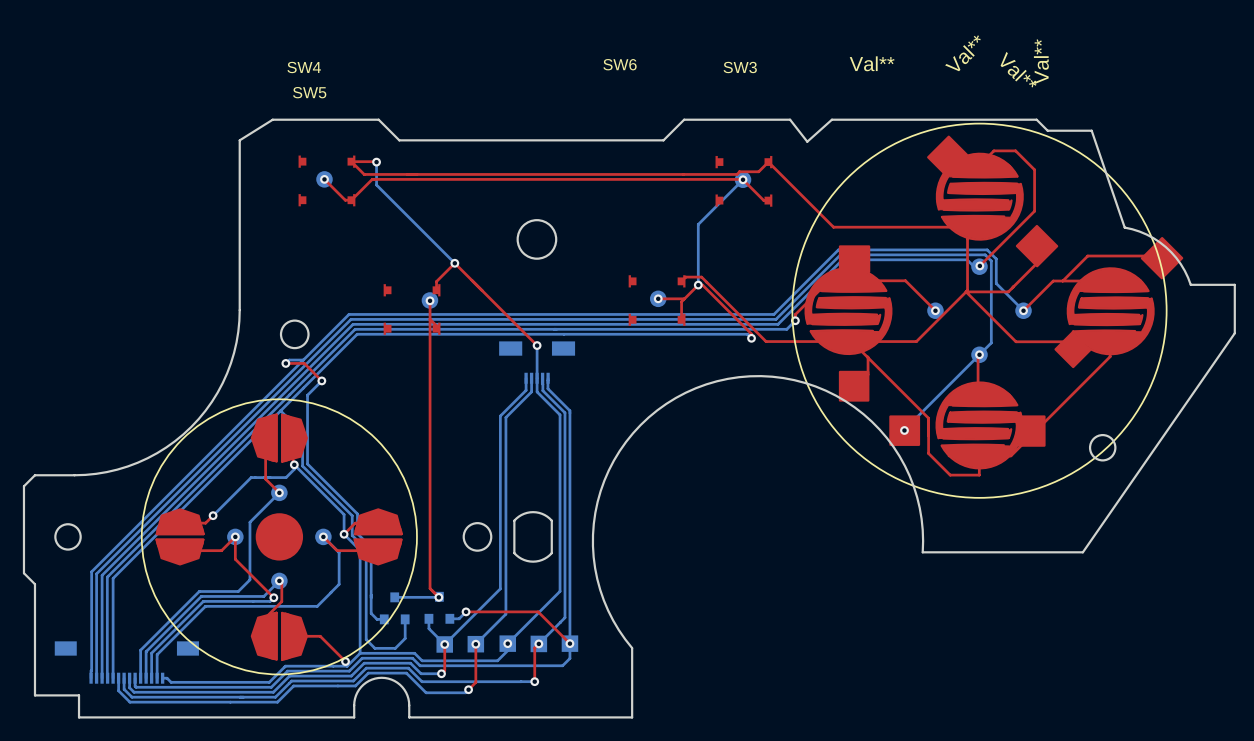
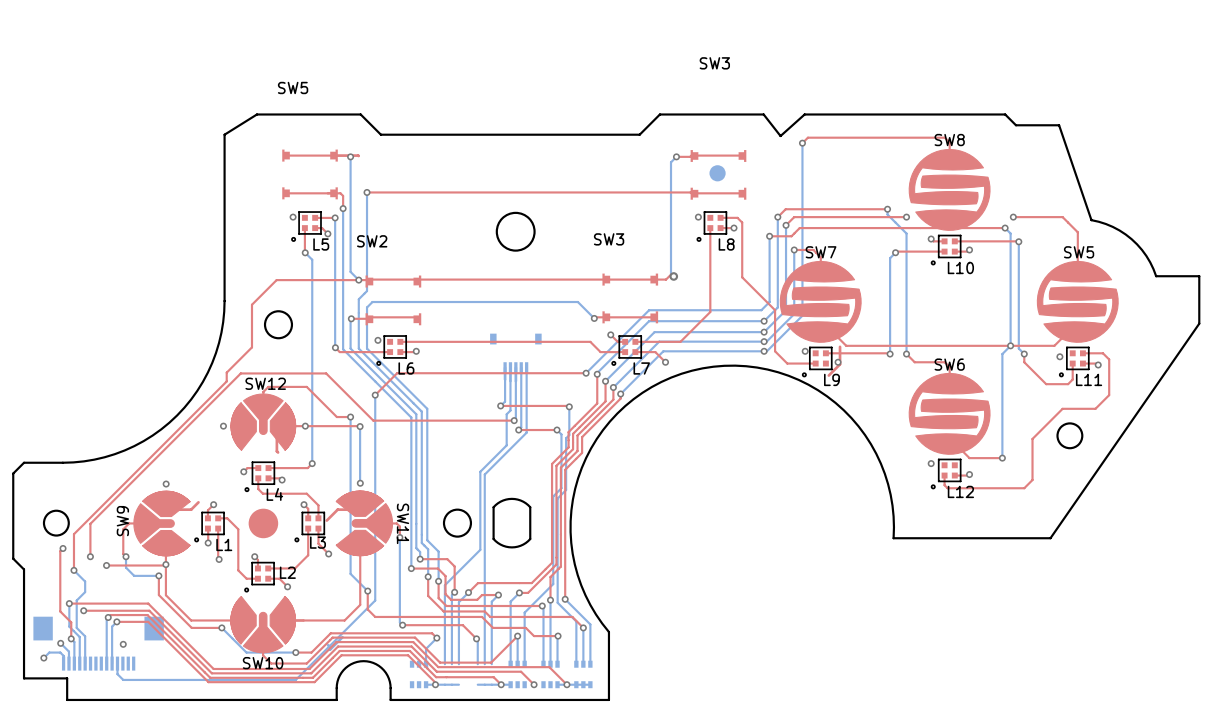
SW6 name position: SW6 (620, 64) -> SW6 (949, 364)
SW4 name: SW4 (304, 67) -> SW2 (372, 241)
top track: none -> (802, 143) (807, 137) (944, 137) (949, 142) (949, 160)
bottom track: none -> (802, 143) (802, 315) (766, 351) (663, 351) (620, 393)
via: none -> (802, 143)
top track: (351, 161) (364, 174) (737, 174) (739, 171) (758, 171) (768, 162) (833, 227) (979, 227) (967, 238) (967, 290) (916, 341) (766, 341) (701, 277) (685, 277) (681, 281) -> (334, 155) (286, 155)
top track: none -> (739, 155) (676, 156)
bottom track: none -> (350, 156) (350, 271) (358, 280)
via: none -> (350, 156)
bottom track: (376, 162) (376, 185) (454, 263) -> none
via: (376, 162) -> none
bottom track: none -> (676, 156) (671, 162) (671, 274)
via: none -> (676, 156)
top track: (978, 166) (993, 150) (1015, 150) (1034, 169) (1034, 211) (979, 265) -> none
top track: (324, 179) (345, 200) -> (286, 193) (327, 193)
part: (324, 179) -> none
via: (324, 179) -> none
bottom track: (743, 179) (698, 224) (698, 285) -> none
via: (743, 179) -> none
SW8: none -> (949, 189)
top track: none -> (367, 192) (739, 193)
bottom track: none -> (367, 192) (367, 291) (358, 299) (358, 348) (421, 411) (421, 543) (428, 549) (428, 576)
via: none -> (367, 192)
top track: (351, 200) (372, 179) (742, 179) (763, 200) (768, 200) -> (334, 193) (340, 193) (343, 195) (343, 208)
part: Val** (992, 201) -> none
bottom track: none -> (343, 208) (343, 349) (411, 417) (411, 568)
via: none -> (343, 208)
top track: none -> (887, 209) (785, 209) (777, 217)
bottom track: none -> (887, 209) (887, 214) (906, 233) (906, 354)
via: none -> (887, 209)
via: none -> (293, 217)
via: none -> (698, 217)
bottom track: none -> (777, 217) (777, 307) (764, 321) (649, 321) (597, 374)
via: none -> (777, 217)
top track: none -> (906, 217) (794, 217) (786, 225)
via: none -> (906, 217)
top track: none -> (1013, 217) (1062, 217) (1077, 232) (1077, 272)
via: none -> (1013, 217)
top track: none -> (315, 217) (335, 217)
bottom track: none -> (335, 217) (335, 347)
via: none -> (335, 217)
top track: none -> (720, 217) (737, 217) (742, 222) (742, 277) (775, 310) (775, 351) (787, 363) (815, 363)
bottom track: none -> (786, 225) (786, 310) (764, 332) (654, 332) (605, 381)
via: none -> (786, 225)
L5: none -> (306, 226)
L8: none -> (711, 226)
top track: none -> (304, 228) (305, 252)
top track: none -> (315, 228) (322, 228) (327, 233)
top track: none -> (710, 228) (710, 311) (680, 341) (635, 341)
top track: none -> (720, 228) (733, 228)
via: none -> (733, 228)
top track: none -> (1005, 228) (957, 228) (949, 220) (941, 228) (799, 228) (791, 236) (769, 236)
bottom track: none -> (1005, 228) (1010, 233) (1010, 345) (1002, 354) (1002, 458)
via: none -> (1005, 228)
via: none -> (327, 233)
bottom track: none -> (769, 236) (769, 302) (761, 310) (649, 310) (586, 373)
via: none -> (769, 236)
top track: none -> (931, 239) (933, 241) (944, 241)
via: none -> (931, 239)
top track: (1051, 248) (1008, 291) (966, 291) (1016, 341) (1110, 341) (1110, 356) (1010, 455) (948, 455) -> none
top track: none -> (954, 241) (1018, 241)
bottom track: none -> (1018, 241) (1018, 348) (1024, 354)
via: none -> (1018, 241)
top track: (1159, 256) (1087, 256) (1062, 281) -> none
top track: none -> (794, 249) (813, 249) (820, 257) (820, 272)
bottom track: none -> (794, 249) (794, 314) (766, 341) (659, 341) (613, 387)
via: none -> (794, 249)
L10: none -> (946, 250)
top track: none -> (969, 249) (954, 251)
via: none -> (969, 249)
top track: none -> (944, 251) (895, 252)
bottom track: none -> (305, 252) (312, 259) (312, 463)
via: none -> (305, 252)
bottom track: none -> (895, 252) (890, 258) (890, 354)
via: none -> (895, 252)
via: (454, 263) -> none
bottom track: (979, 265) (974, 266) (967, 259) (842, 259) (778, 324) (353, 324) (102, 575) (102, 678) -> none
via: (979, 265) -> none
part: (979, 266) -> none
SW6 footprint: [628, 275, 686, 326] -> [908, 372, 991, 455]
top track: (1109, 281) (1053, 281) (1023, 310) -> none
top track: none -> (671, 274) (666, 279) (276, 280) (251, 304) (251, 347) (226, 372) (226, 381) (73, 534) (73, 570)
via: none -> (358, 280)
top track: (436, 290) (436, 281) (454, 263) (537, 345) -> none
top track: (658, 298) (684, 298) -> none
part: (658, 298) -> none
via: (658, 298) -> none
part: (429, 300) -> none
top track: (430, 300) (430, 588) (438, 597) -> none
via: (430, 300) -> none
part: Val** (1118, 302) -> none
SW3: none -> (630, 298)
top track: (935, 310) (905, 280) (829, 280) (795, 314) (795, 320) -> none
part: (935, 310) -> none
via: (935, 310) -> none
part: (979, 310) -> none
bottom track: (1023, 310) (996, 283) (996, 258) (987, 249) (838, 249) (773, 314) (348, 314) (91, 571) (91, 678) -> none
part: (1023, 310) -> none
via: (1023, 310) -> none
SW7: none -> (820, 301)
SW5: none -> (1077, 301)
top track: (430, 319) (436, 325) (436, 328) -> none
top track: (681, 319) (681, 301) (698, 285) (702, 285) (751, 333) (751, 338) -> none
bottom track: (795, 320) (786, 329) (355, 329) (107, 577) (107, 678) -> none
via: (795, 320) -> none
part: Val** (854, 323) -> none
top track: none -> (419, 317) (351, 318)
top track: none -> (654, 317) (594, 318)
bottom track: none -> (594, 318) (577, 302) (372, 302) (367, 307) (367, 348) (427, 408) (427, 540) (438, 551) (438, 581)
via: none -> (594, 318)
bottom track: none -> (351, 318) (350, 348) (416, 414) (416, 548) (420, 552) (420, 559)
via: none -> (351, 318)
via: none -> (764, 321)
bottom track: (751, 338) (747, 334) (357, 334) (113, 578) (113, 678) -> none
via: (751, 338) -> none
part footprint: [499, 341, 576, 384] -> [490, 333, 542, 374]
via: none -> (764, 332)
top track: none -> (820, 331) (832, 331) (846, 345) (1054, 345) (1068, 331) (1077, 331)
top track: none -> (610, 334) (617, 341) (625, 341)
via: none -> (610, 334)
bottom track: (537, 345) (537, 378) -> none
via: (537, 345) -> none
via: none -> (377, 340)
top track: (854, 350) (860, 350) (928, 418) (928, 453) (950, 475) (979, 475) (979, 459) -> none
top track: none -> (400, 341) (590, 341) (600, 352) (625, 352)
via: none -> (764, 341)
top track: (979, 354) (978, 395) -> none
part: (979, 354) -> none
via: (979, 354) -> none
via: none -> (1010, 345)
top track: none -> (335, 347) (339, 352) (390, 352)
via: none -> (335, 347)
bottom track: (303, 360) (289, 360) (285, 363) -> none
L6: none -> (391, 350)
L7: none -> (626, 350)
top track: none -> (416, 351) (400, 352)
via: none -> (416, 351)
via: none -> (764, 351)
via: none -> (805, 351)
top track: none -> (635, 352) (655, 352) (665, 362)
top track: (285, 363) (304, 363) (321, 380) -> none
via: (285, 363) -> none
top track: none -> (825, 353) (890, 354)
top track: none -> (1082, 353) (1102, 353) (1109, 359) (1109, 395) (1095, 408) (1062, 408) (1032, 438) (1032, 480) (1024, 488) (947, 488) (944, 485) (944, 475)
via: none -> (890, 354)
top track: none -> (906, 354) (914, 362) (944, 362) (949, 367) (949, 384)
via: none -> (906, 354)
top track: none -> (1024, 354) (1024, 362) (1046, 384) (1068, 384) (1072, 379) (1072, 363)
via: none -> (1024, 354)
via: none -> (1059, 356)
via: none -> (665, 362)
L9: none -> (817, 361)
via: none -> (838, 362)
L11: none -> (1074, 361)
top track: none -> (1082, 363) (1098, 365)
via: none -> (1098, 365)
bottom track: (321, 380) (307, 395) (307, 464) (357, 513) (357, 533) (371, 547) (371, 613) (377, 619) (384, 619) -> none
via: (321, 380) -> none
bottom track: (548, 380) (547, 388) (569, 410) (569, 658) (562, 665) (420, 665) (412, 658) (362, 658) (349, 671) (287, 671) (271, 687) (136, 687) (135, 678) -> (526, 369) (526, 432) (484, 474) (484, 664)
bottom track: (542, 383) (542, 390) (564, 412) (564, 617) (538, 643) -> (521, 373) (521, 427) (518, 430)
top track: none -> (586, 373) (397, 373) (375, 395)
via: none -> (586, 373)
top track: none -> (597, 374) (597, 403) (568, 432) (568, 447) (552, 463) (552, 562) (531, 583) (478, 583) (468, 592)
via: none -> (597, 374)
bottom track: (526, 390) (500, 416) (500, 588) (444, 644) (428, 628) (428, 618) -> (505, 379) (505, 401) (500, 405)
bottom track: (531, 391) (505, 417) (505, 614) (475, 644) -> (510, 381) (510, 410) (506, 414) (506, 445) (480, 471) (480, 549) (444, 585) (444, 664)
bottom track: (537, 391) (560, 414) (560, 591) (507, 643) (507, 650) (497, 660) (422, 660) (414, 653) (360, 653) (360, 550) (344, 534) (344, 514) (294, 464) (294, 469) (286, 477) (251, 477) (213, 515) -> (515, 381) (515, 418) (514, 420)
top track: none -> (605, 381) (605, 401) (573, 433) (573, 449) (556, 465) (556, 564) (528, 592) (519, 592)
via: none -> (605, 381)
top track: none -> (613, 387) (613, 399) (577, 435) (577, 451) (560, 467) (560, 566) (550, 576) (550, 600)
via: none -> (613, 387)
top track: none -> (620, 393) (620, 398) (582, 437) (582, 452) (565, 469) (565, 599)
via: none -> (620, 393)
bottom track: none -> (375, 395) (375, 600) (295, 679) (123, 679) (117, 674) (117, 663)
via: none -> (375, 395)
bottom track: (280, 410) (302, 432) (302, 466) (352, 515) (352, 535) (366, 549) (366, 639) (374, 648) (395, 648) (405, 638) (405, 619) -> none
top track: none -> (263, 400) (263, 391) (268, 386) (306, 386) (336, 417) (350, 417)
top track: none -> (500, 405) (569, 406)
via: none -> (500, 405)
bottom track: none -> (569, 406) (569, 435) (566, 438) (566, 490) (557, 498) (557, 602) (576, 621) (576, 664)
via: none -> (569, 406)
bottom track: none -> (350, 417) (350, 573) (367, 591)
via: none -> (350, 417)
bottom track: (904, 430) (991, 342) (991, 261) (985, 254) (840, 254) (775, 319) (351, 319) (96, 573) (96, 678) -> none
via: (904, 430) -> none
part: Val** (967, 431) -> none
top track: none -> (514, 420) (373, 420) (326, 373) (240, 373) (90, 523) (90, 556)
via: none -> (514, 420)
SW12: none -> (263, 422)
via: none -> (223, 426)
via: none -> (305, 426)
top track: (265, 438) (265, 479) (279, 492) -> none
top track: none -> (286, 426) (360, 426)
bottom track: none -> (360, 426) (360, 483)
via: none -> (360, 426)
top track: none -> (518, 430) (557, 430)
via: none -> (518, 430)
bottom track: none -> (557, 430) (561, 434) (561, 488) (553, 496) (553, 584) (524, 612) (524, 664)
via: none -> (557, 430)
top track: none -> (949, 443) (955, 443) (969, 458) (1002, 458)
via: (294, 464) -> none
via: none -> (1002, 458)
top track: none -> (312, 463) (307, 468) (268, 468)
via: none -> (312, 463)
via: none -> (931, 463)
top track: none -> (258, 468) (247, 468) (243, 471)
via: none -> (243, 471)
L12: none -> (946, 473)
top track: none -> (969, 474) (954, 475)
via: none -> (969, 474)
L4: none -> (259, 476)
top track: none -> (258, 478) (258, 489) (262, 493) (306, 493) (318, 505) (318, 518)
top track: none -> (268, 478) (282, 480)
bottom track: (279, 492) (249, 522) (249, 579) (238, 591) (199, 591) (140, 650) (140, 678) -> none
part: (279, 492) -> none
via: (279, 492) -> none
via: none -> (282, 480)
via: none -> (166, 484)
via: none -> (360, 483)
via: (213, 515) -> none
top track: none -> (213, 504) (207, 510) (207, 518)
via: none -> (213, 504)
top track: none -> (304, 504) (308, 508) (308, 518)
via: none -> (304, 504)
drawing: none -> [248, 508, 279, 539]
top track: none -> (218, 518) (227, 518) (238, 529) (238, 570) (246, 578) (257, 578)
via: (344, 534) -> none
part: (235, 536) -> none
via: (235, 536) -> none
part: (279, 536) -> none
top track: (323, 536) (337, 550) (378, 550) -> none
bottom track: (323, 536) (339, 552) (339, 584) (330, 592) -> none
part: (323, 536) -> none
via: (323, 536) -> none
top track: none -> (140, 523) (129, 523) (123, 529) (123, 553) (126, 556)
SW9: none -> (161, 523)
SW11: none -> (364, 523)
top track: none -> (385, 523) (396, 523) (399, 526) (399, 537)
L1: none -> (209, 527)
L3: none -> (309, 527)
top track: none -> (207, 528) (208, 543)
top track: none -> (218, 528) (219, 559)
top track: none -> (308, 528) (308, 555) (295, 568) (268, 568)
top track: none -> (318, 528) (318, 543) (328, 553)
top track: (180, 550) (221, 550) (235, 536) (235, 559) (273, 597) -> none
bottom track: none -> (399, 537) (399, 622) (402, 625)
via: none -> (399, 537)
via: none -> (208, 543)
top track: none -> (166, 546) (165, 595) (191, 620) (240, 620)
top track: none -> (63, 548) (60, 551) (60, 611) (71, 622) (71, 638)
via: none -> (63, 548)
via: none -> (328, 553)
via: none -> (90, 556)
bottom track: none -> (126, 556) (126, 567) (134, 575) (158, 575)
via: none -> (126, 556)
top track: none -> (254, 556) (257, 559) (257, 568)
via: none -> (254, 556)
via: none -> (219, 559)
top track: none -> (420, 559) (447, 559) (454, 566) (454, 592)
via: none -> (420, 559)
top track: none -> (165, 564) (106, 565)
via: none -> (165, 564)
via: none -> (106, 565)
top track: (279, 580) (281, 583) (281, 601) (265, 617) (265, 636) -> none
bottom track: (279, 580) (263, 596) (201, 596) (146, 651) (146, 678) -> none
part: (279, 580) -> none
via: (279, 580) -> none
top track: none -> (411, 568) (438, 568) (445, 576) (445, 594) (451, 599) (477, 599) (482, 595) (498, 595)
via: none -> (411, 568)
bottom track: none -> (73, 570) (85, 581) (85, 592) (76, 600) (76, 627) (85, 636) (85, 663)
via: none -> (73, 570)
top track: none -> (158, 575) (158, 595) (191, 627) (221, 627)
via: none -> (158, 575)
top track: none -> (428, 576) (428, 595) (443, 611) (484, 611) (490, 616) (572, 616) (583, 627)
via: none -> (428, 576)
L2: none -> (259, 577)
bottom track: (330, 592) (317, 606) (205, 606) (157, 654) (157, 678) -> none
top track: none -> (268, 578) (279, 578) (287, 586)
bottom track: (439, 596) (394, 597) -> none
top track: none -> (438, 581) (438, 598) (446, 606) (542, 606)
via: none -> (438, 581)
bottom track: (273, 597) (270, 601) (203, 601) (151, 653) (151, 678) -> none
via: (273, 597) -> none
via: (438, 597) -> none
via: none -> (287, 586)
top track: none -> (367, 591) (367, 609) (375, 616) (482, 616) (492, 627) (525, 627) (534, 636) (558, 636)
via: none -> (367, 591)
part: (439, 607) -> none
bottom track: none -> (454, 592) (451, 595) (451, 664)
via: none -> (454, 592)
bottom track: none -> (468, 592) (458, 602) (458, 664)
via: none -> (468, 592)
part: (394, 608) -> none
bottom track: none -> (519, 592) (510, 601) (510, 664)
via: none -> (519, 592)
bottom track: none -> (498, 595) (491, 601) (491, 664)
via: none -> (498, 595)
top track: (466, 611) (538, 611) (569, 643) -> none
bottom track: (466, 611) (459, 618) (449, 619) -> none
via: (466, 611) -> none
bottom track: none -> (565, 599) (590, 624) (590, 664)
via: none -> (565, 599)
bottom track: none -> (550, 600) (550, 664)
via: none -> (550, 600)
top track: none -> (69, 603) (148, 603) (213, 668) (309, 668) (336, 642) (413, 642) (438, 667) (549, 667) (566, 684)
bottom track: none -> (69, 603) (69, 626) (79, 637) (79, 663)
via: none -> (69, 603)
bottom track: none -> (542, 606) (543, 664)
via: none -> (542, 606)
top track: none -> (83, 610) (149, 610) (211, 673) (311, 673) (338, 646) (411, 646) (436, 671) (521, 671) (534, 684)
via: none -> (83, 610)
top track: none -> (108, 617) (110, 615) (147, 615) (210, 677) (312, 677) (339, 650) (409, 650) (436, 677) (493, 677) (501, 684)
bottom track: none -> (108, 617) (106, 663)
via: none -> (108, 617)
top track: (320, 636) (345, 661) -> (303, 620) (344, 620) (360, 604) (360, 546)
top track: none -> (116, 621) (148, 621) (208, 682) (314, 682) (341, 655) (408, 655) (435, 684)
bottom track: none -> (116, 621) (112, 626) (112, 663)
via: none -> (116, 621)
SW10: none -> (263, 624)
top track: none -> (402, 625) (462, 625) (476, 638)
via: none -> (402, 625)
bottom track: none -> (221, 627) (246, 652) (295, 652)
via: none -> (221, 627)
part: (507, 643) -> none
via: (507, 643) -> none
top track: (538, 643) (534, 648) (534, 681) -> none
part: (538, 643) -> none
via: (538, 643) -> none
part: (569, 643) -> none
via: (569, 643) -> none
bottom track: none -> (583, 627) (583, 664)
via: none -> (583, 627)
top track: (444, 644) (444, 670) (441, 673) -> none
part: (444, 644) -> none
via: (444, 644) -> none
top track: (475, 644) (475, 682) (468, 689) -> none
part: (475, 644) -> none
via: (475, 644) -> none
top track: none -> (517, 636) (491, 662) (440, 662) (415, 637) (332, 637) (306, 663) (271, 663) (263, 655) (263, 646)
bottom track: none -> (517, 636) (517, 664)
via: none -> (517, 636)
bottom track: none -> (558, 636) (557, 664)
via: none -> (558, 636)
top track: none -> (436, 638) (432, 633) (330, 633) (311, 652) (295, 652)
bottom track: none -> (436, 638) (426, 648) (426, 664)
via: none -> (436, 638)
bottom track: none -> (71, 638) (74, 641) (74, 663)
via: none -> (71, 638)
bottom track: none -> (476, 638) (477, 664)
via: none -> (476, 638)
bottom track: none -> (60, 643) (68, 651) (68, 663)
via: none -> (60, 643)
part: none -> (98, 643)
via: none -> (123, 644)
via: (345, 661) -> none
part: (126, 662) -> none
bottom track: (347, 666) (285, 666) (269, 682) (171, 682) (167, 678) (162, 678) -> none
via: none -> (295, 652)
bottom track: (441, 673) (421, 673) (410, 663) (364, 663) (351, 676) (289, 676) (273, 692) (134, 692) (129, 687) (129, 678) -> none
via: (441, 673) -> none
bottom track: none -> (43, 658) (49, 652) (60, 652) (63, 655) (63, 663)
via: none -> (43, 658)
bottom track: (118, 678) (118, 690) (129, 702) (277, 702) (293, 685) (355, 685) (368, 673) (406, 673) (426, 692) (465, 692) (468, 689) -> none
bottom track: (124, 678) (124, 689) (132, 697) (275, 697) (291, 681) (353, 681) (366, 668) (408, 668) (422, 681) (521, 681) -> none
bottom track: (521, 681) (534, 681) -> none
via: (534, 681) -> none
via: (468, 689) -> none
part: none -> (419, 674)
part: none -> (517, 674)
part: none -> (550, 674)
part: none -> (583, 674)
bottom track: none -> (426, 684) (458, 684)
via: none -> (435, 684)
bottom track: none -> (477, 684) (510, 684)
via: none -> (501, 684)
via: none -> (534, 684)
bottom track: none -> (557, 684) (590, 684)
via: none -> (566, 684)

